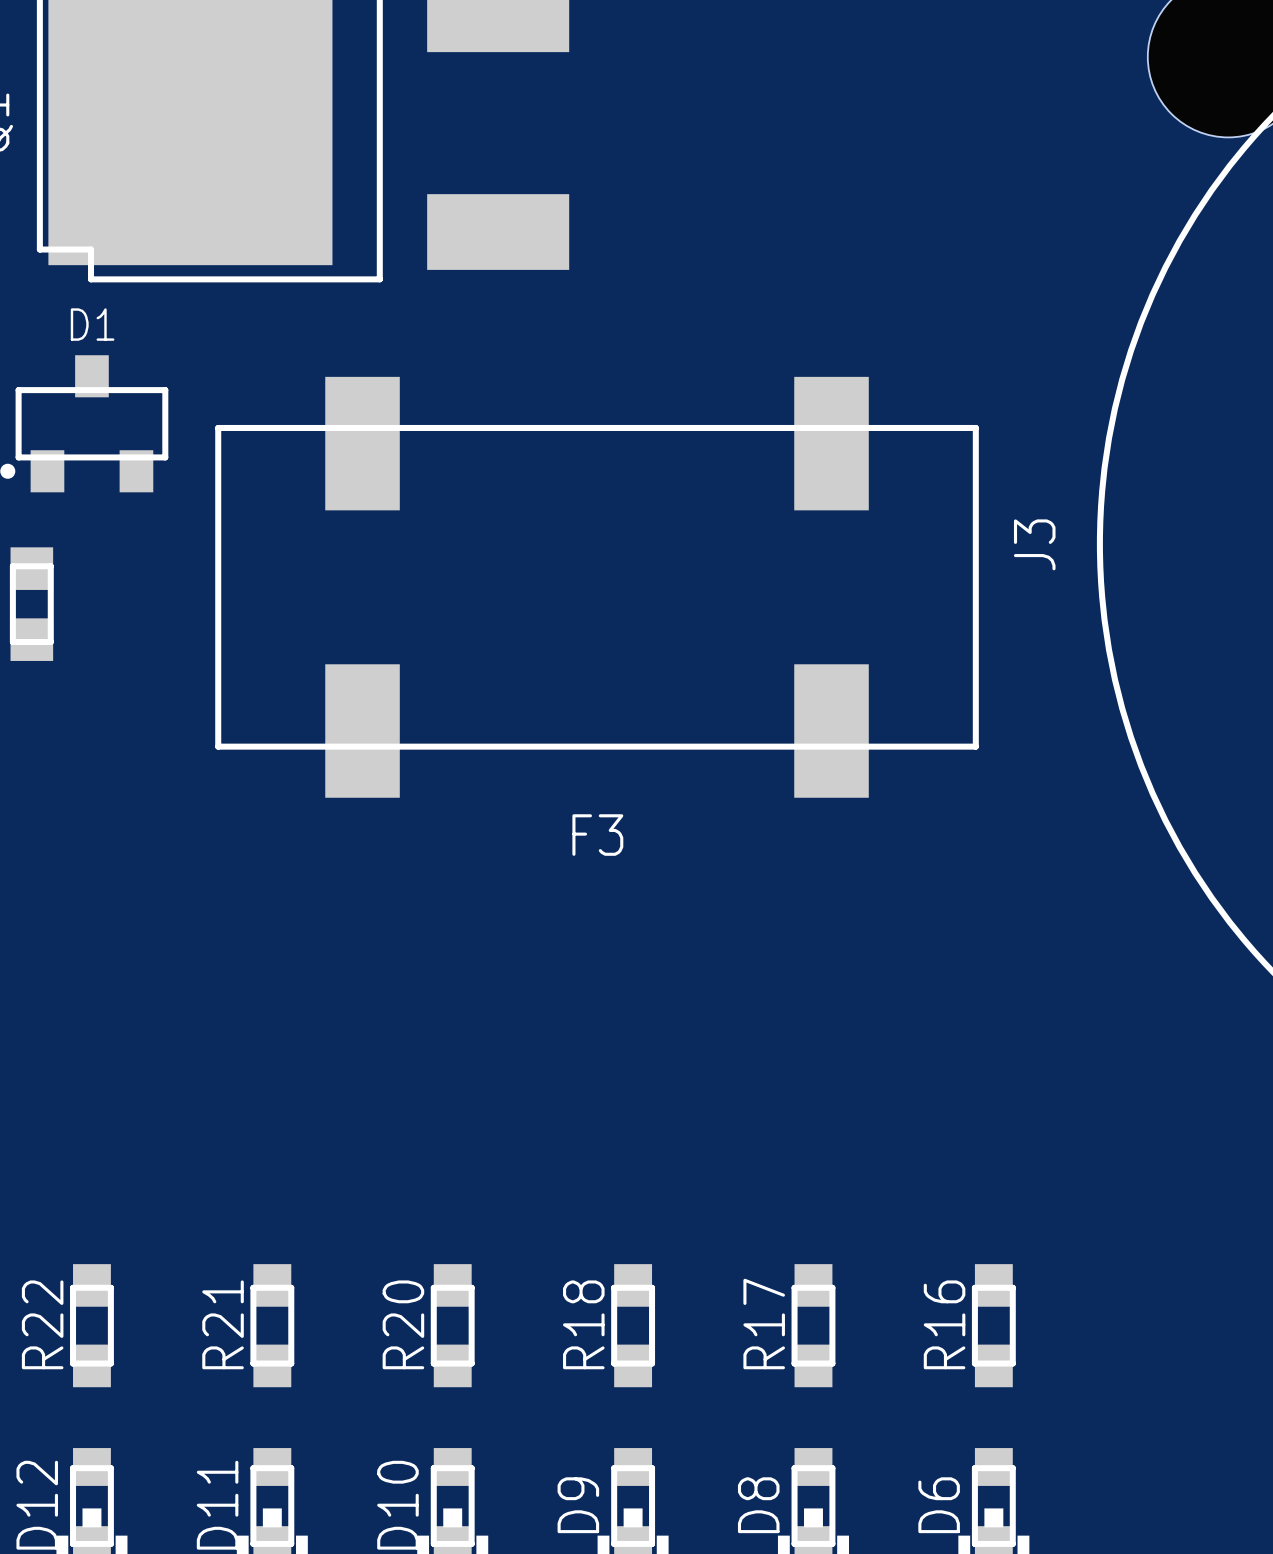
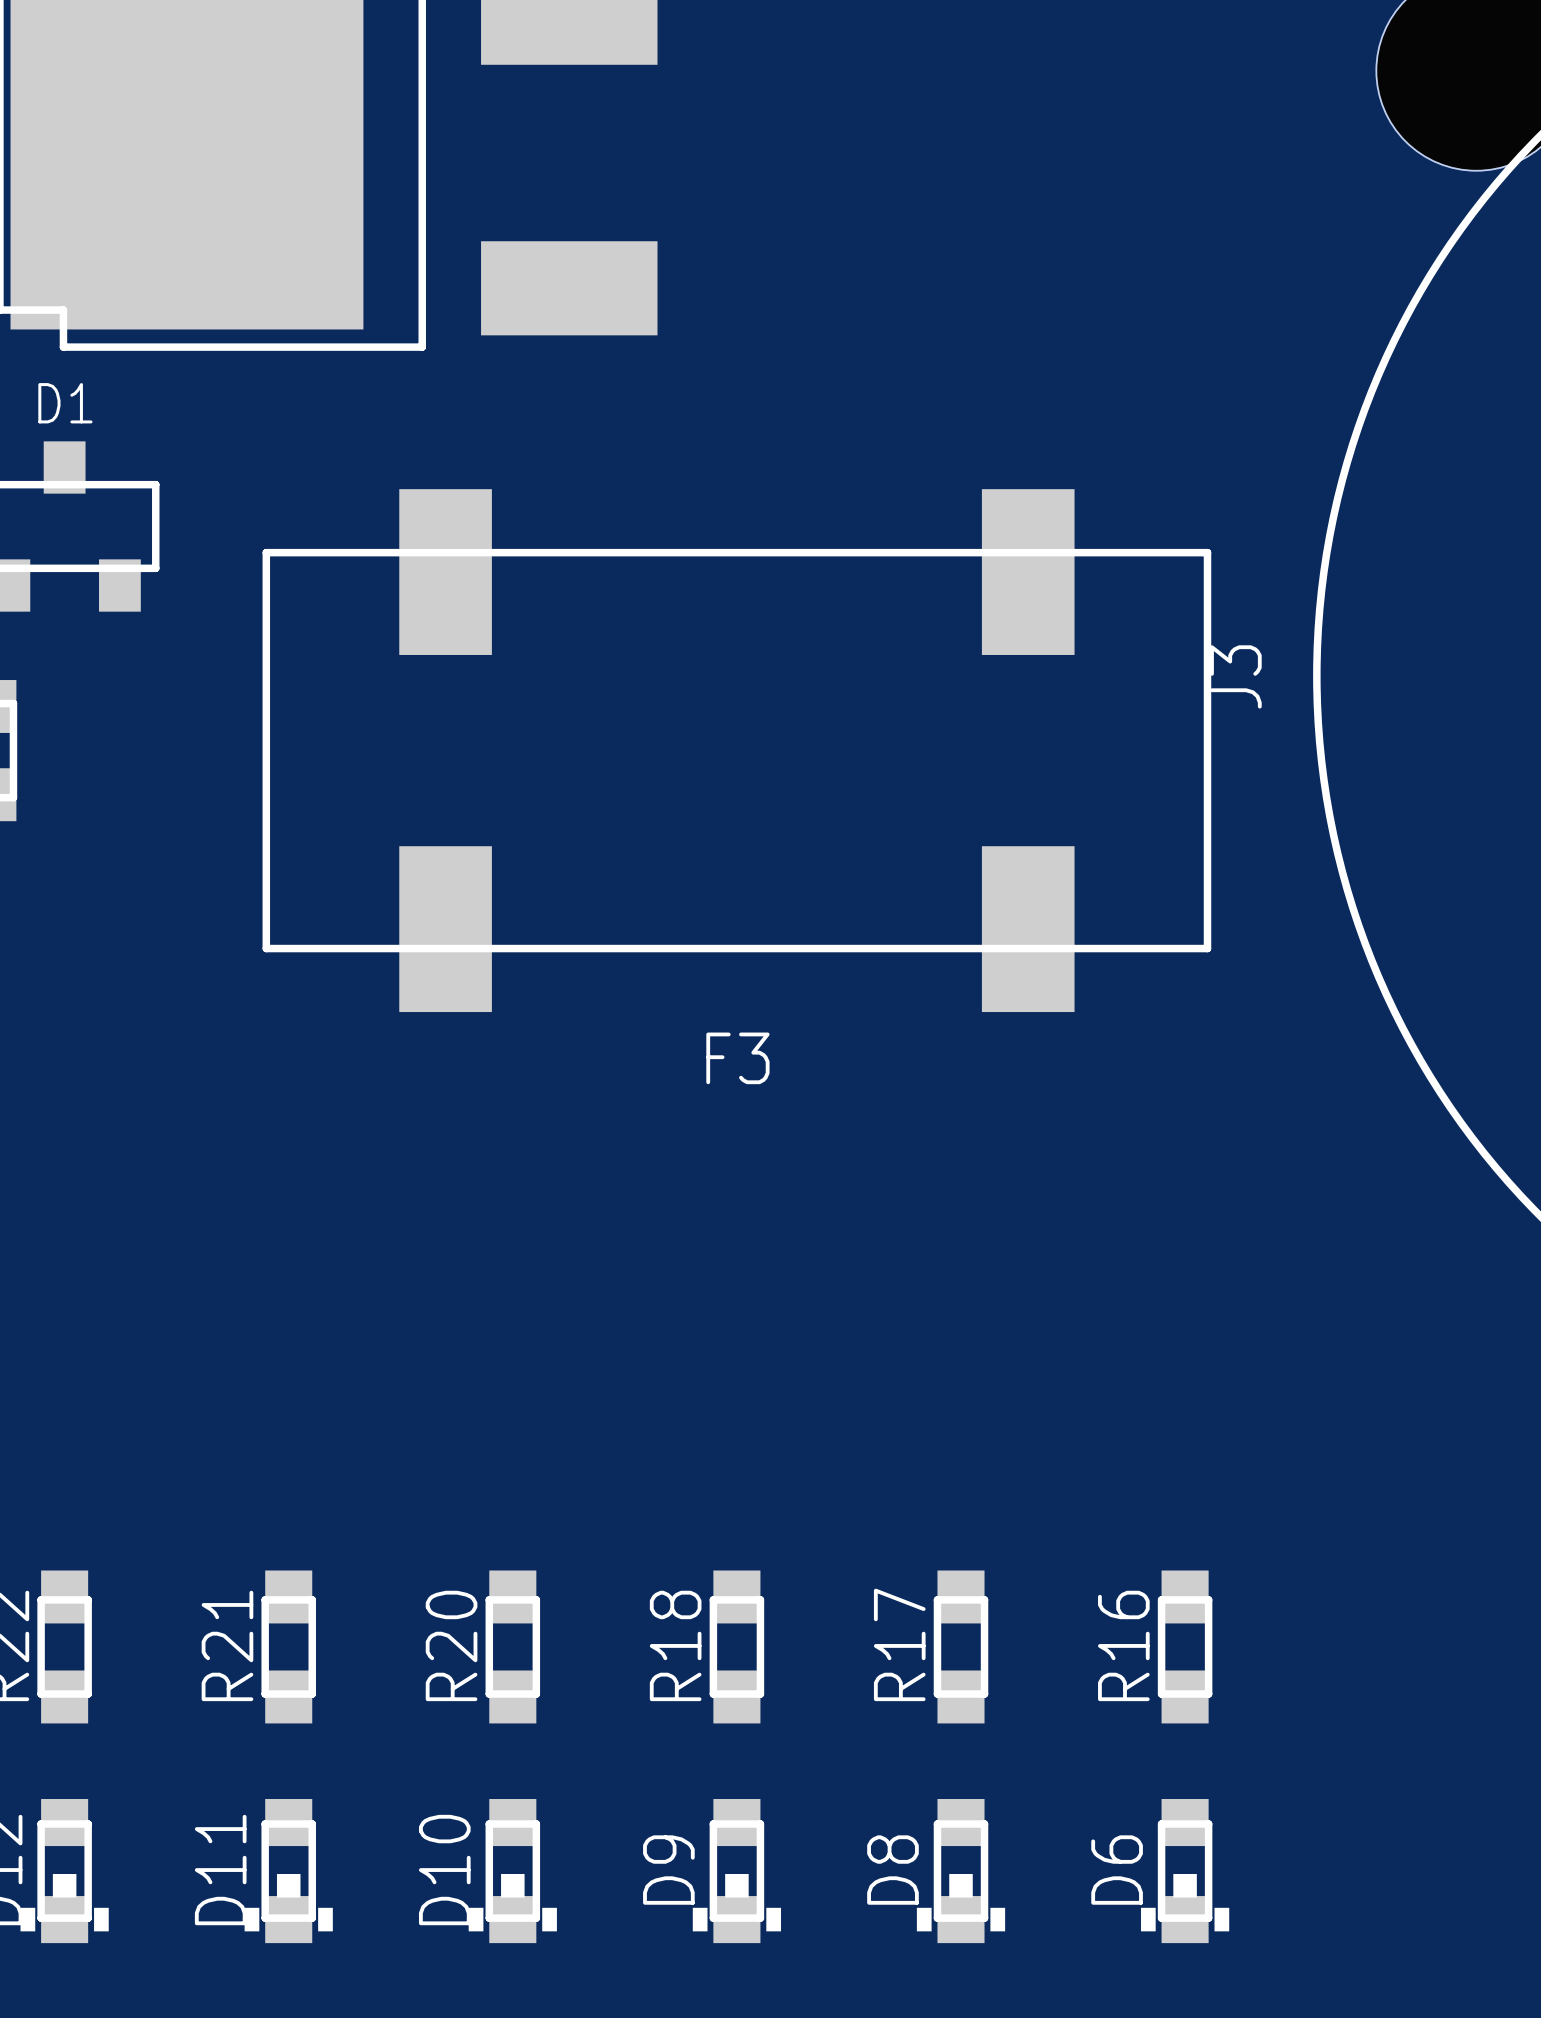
F3 position: (597, 587) -> (736, 750)

